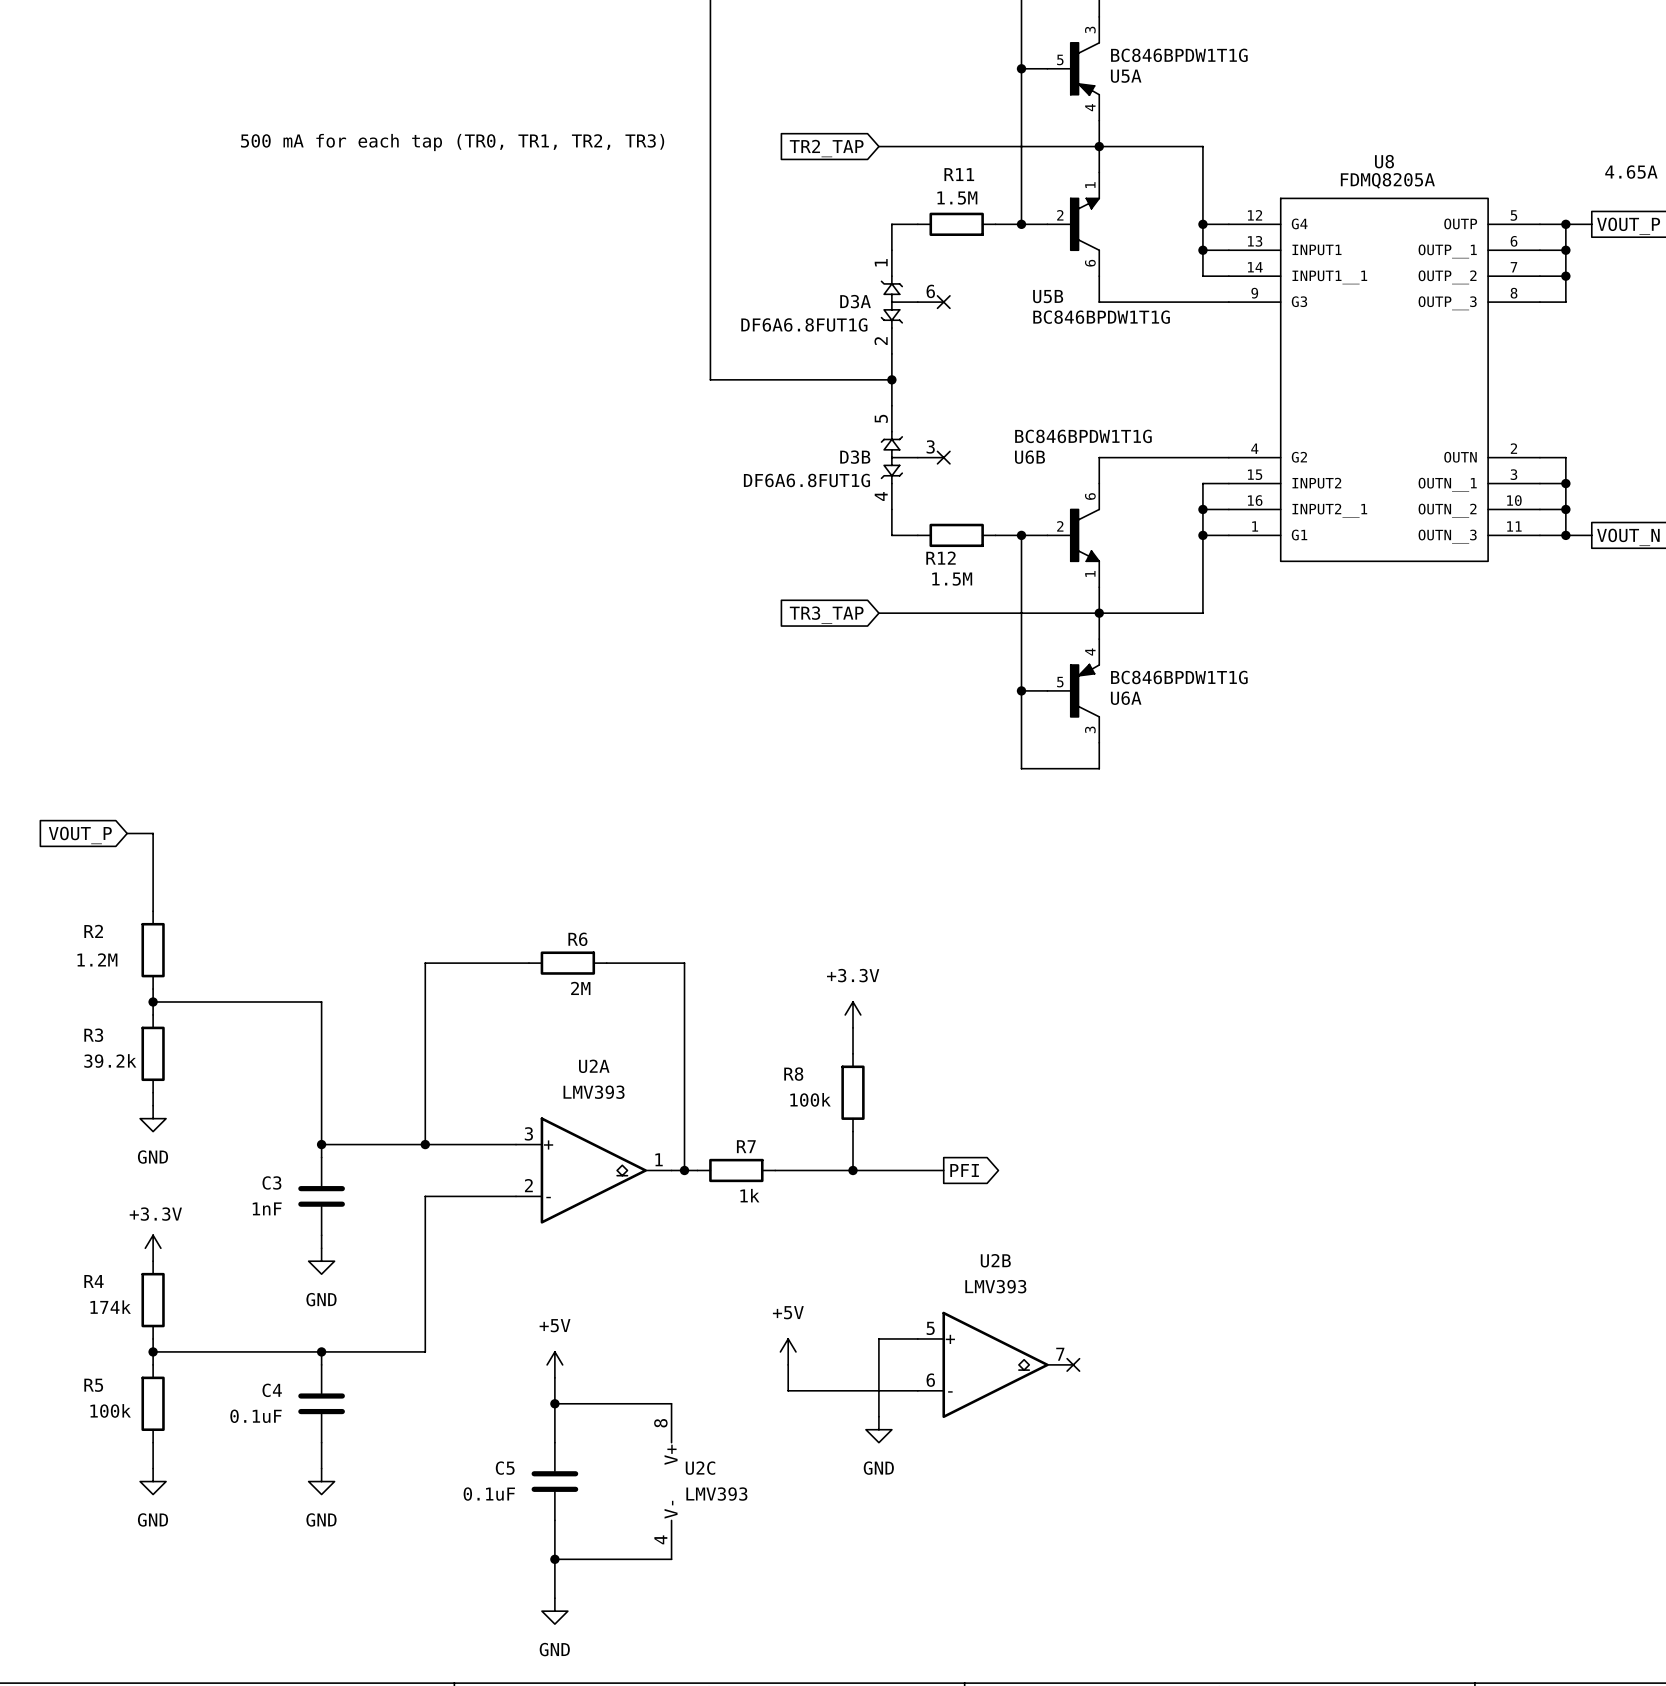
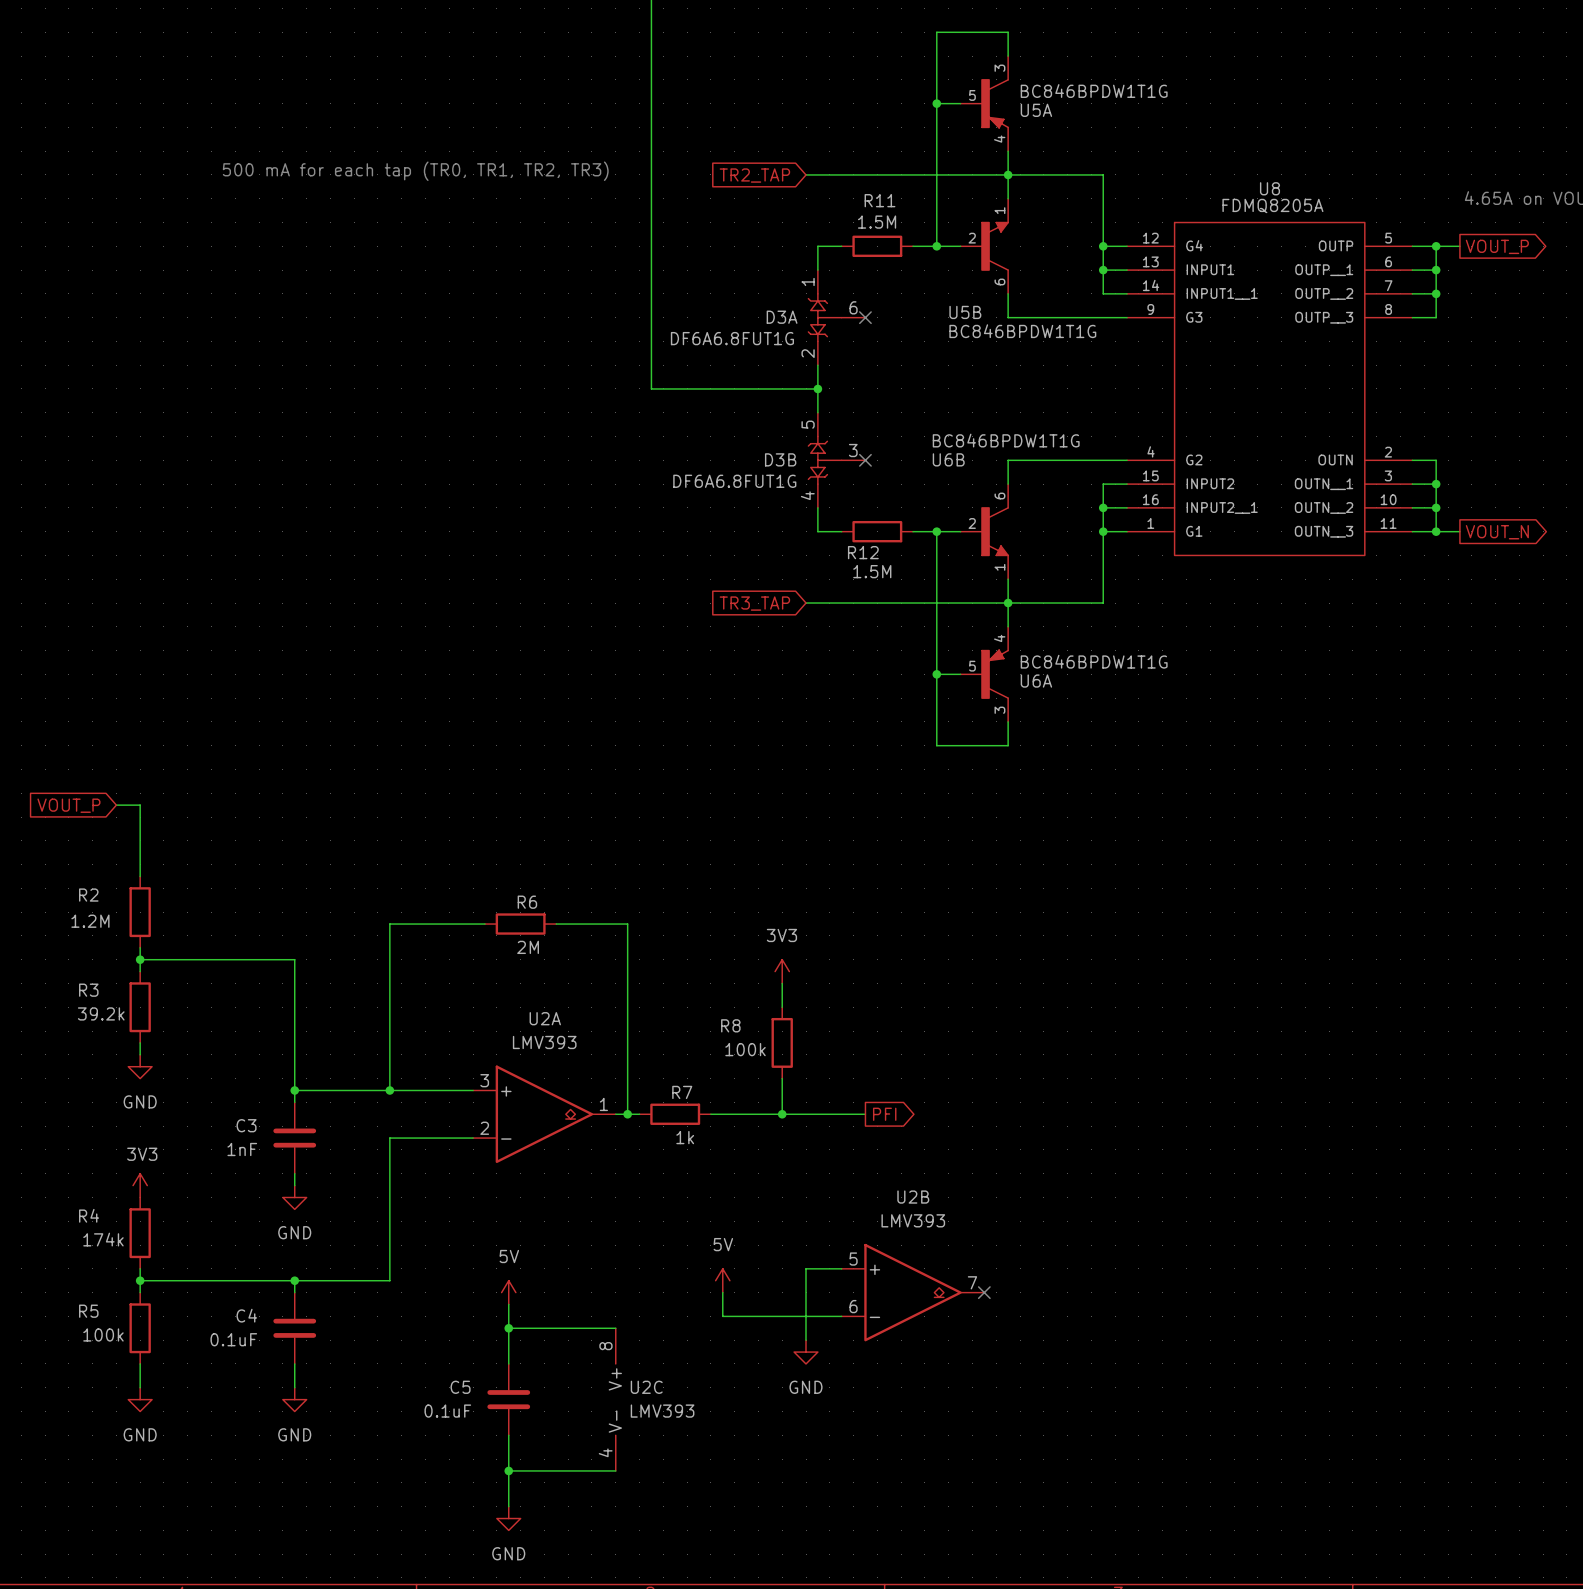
power symbol: +3.3V (853, 1014) -> 3V3 (782, 971)
power symbol: +3.3V (153, 1248) -> 3V3 (140, 1185)
power symbol: +5V (788, 1351) -> 5V (722, 1280)
power symbol: +5V (554, 1364) -> 5V (508, 1292)

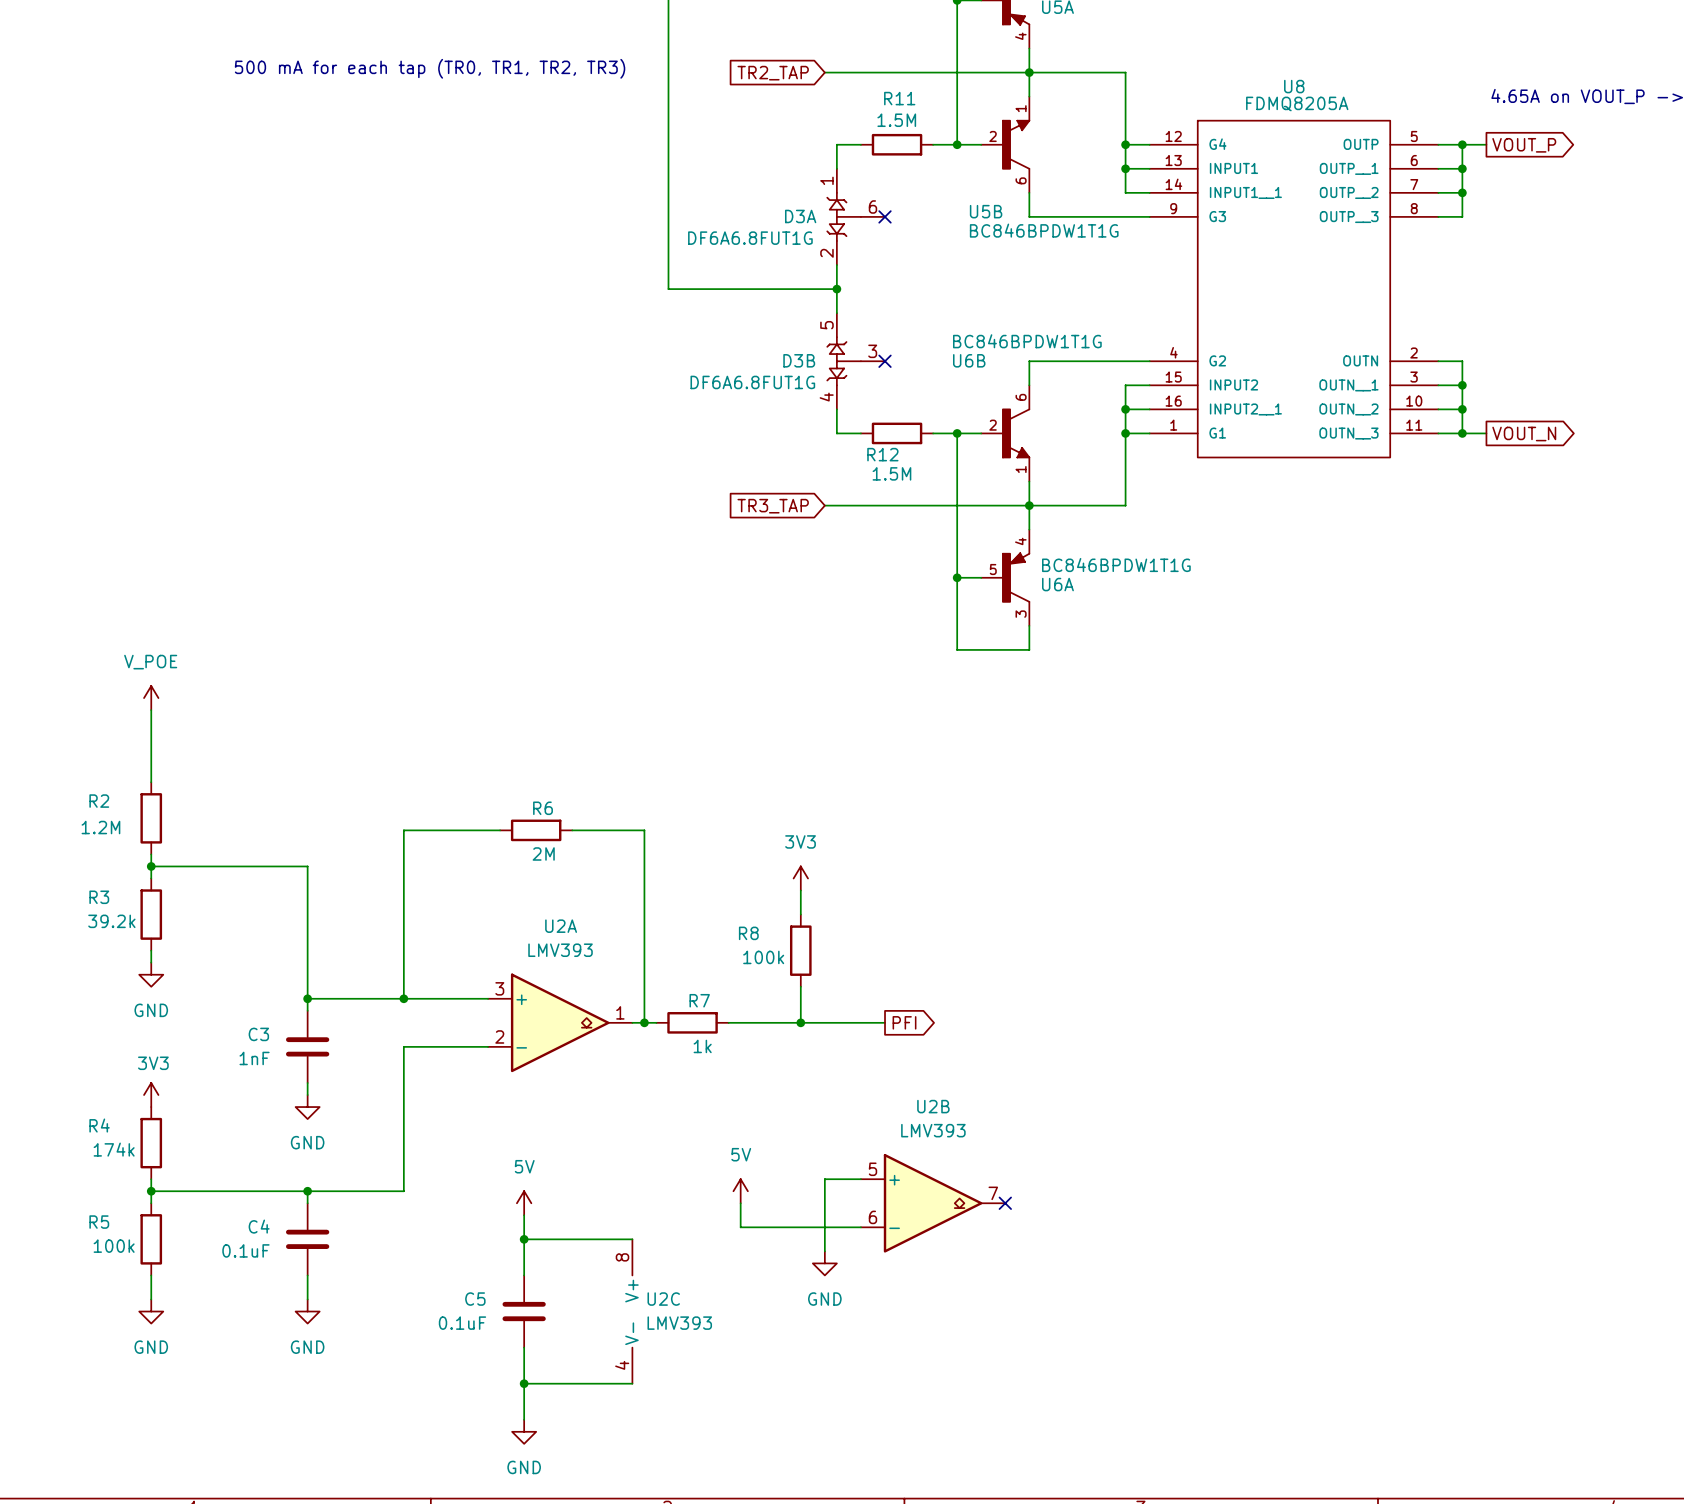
power symbol: none -> V_POE (151, 698)
global label: VOUT_P (68, 805) -> none
wire: (116, 805) (140, 805) -> none

